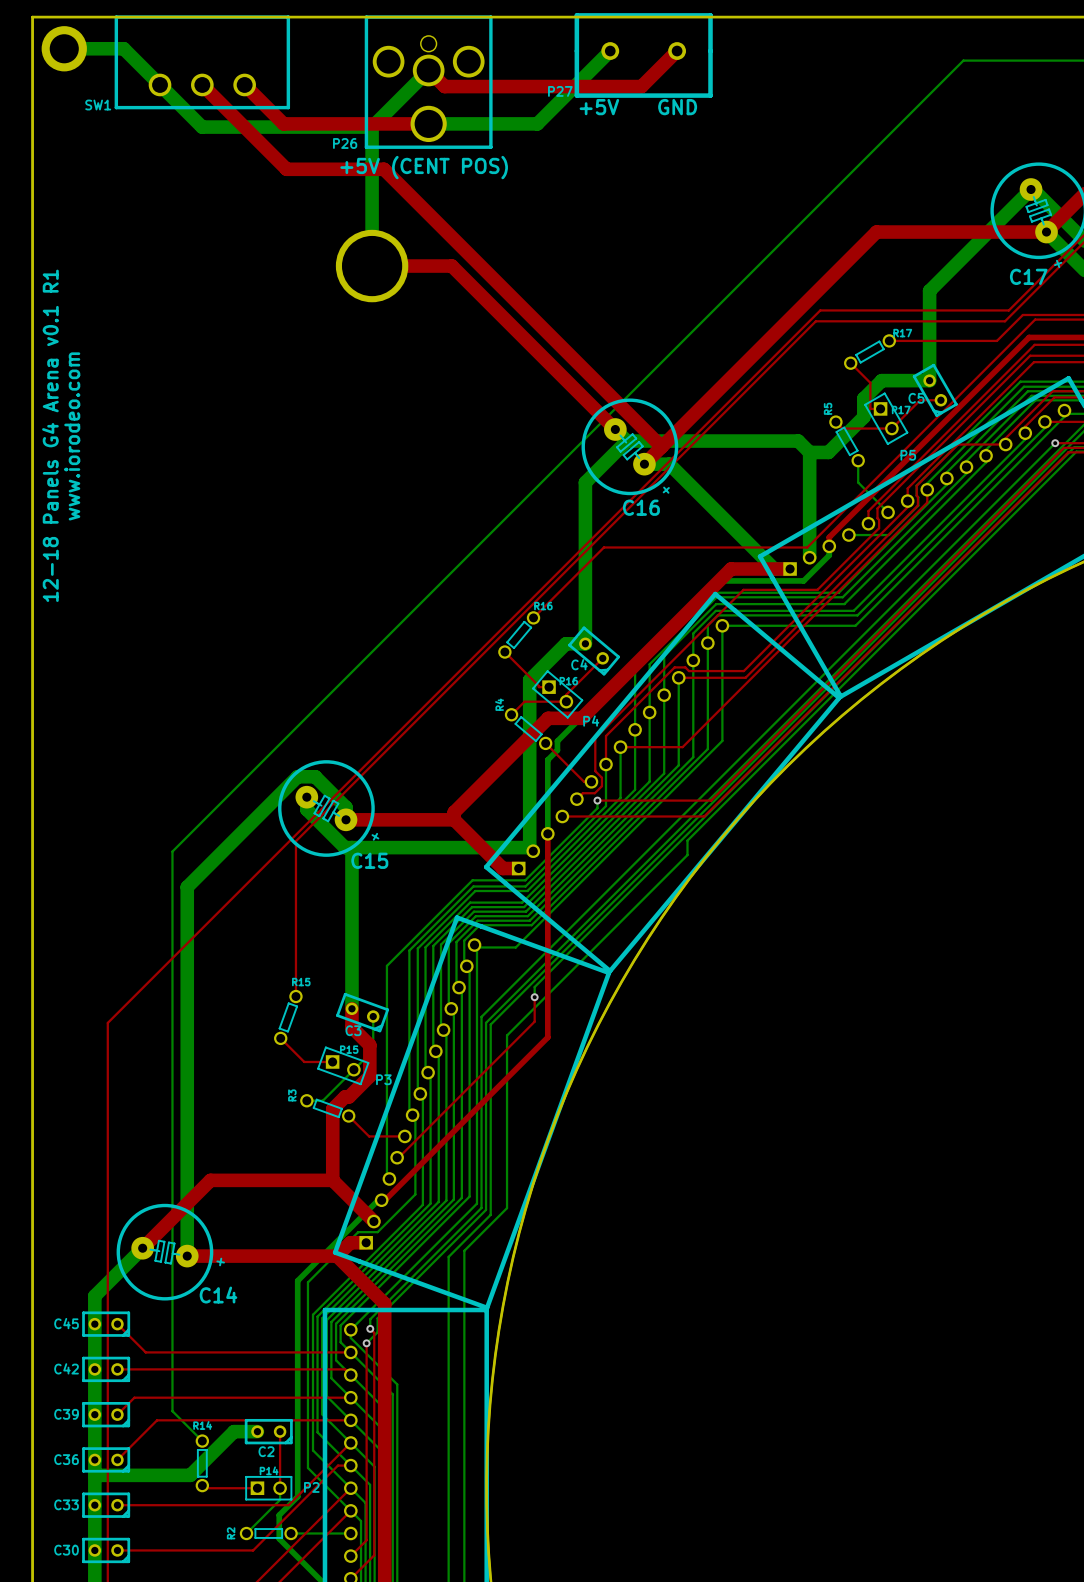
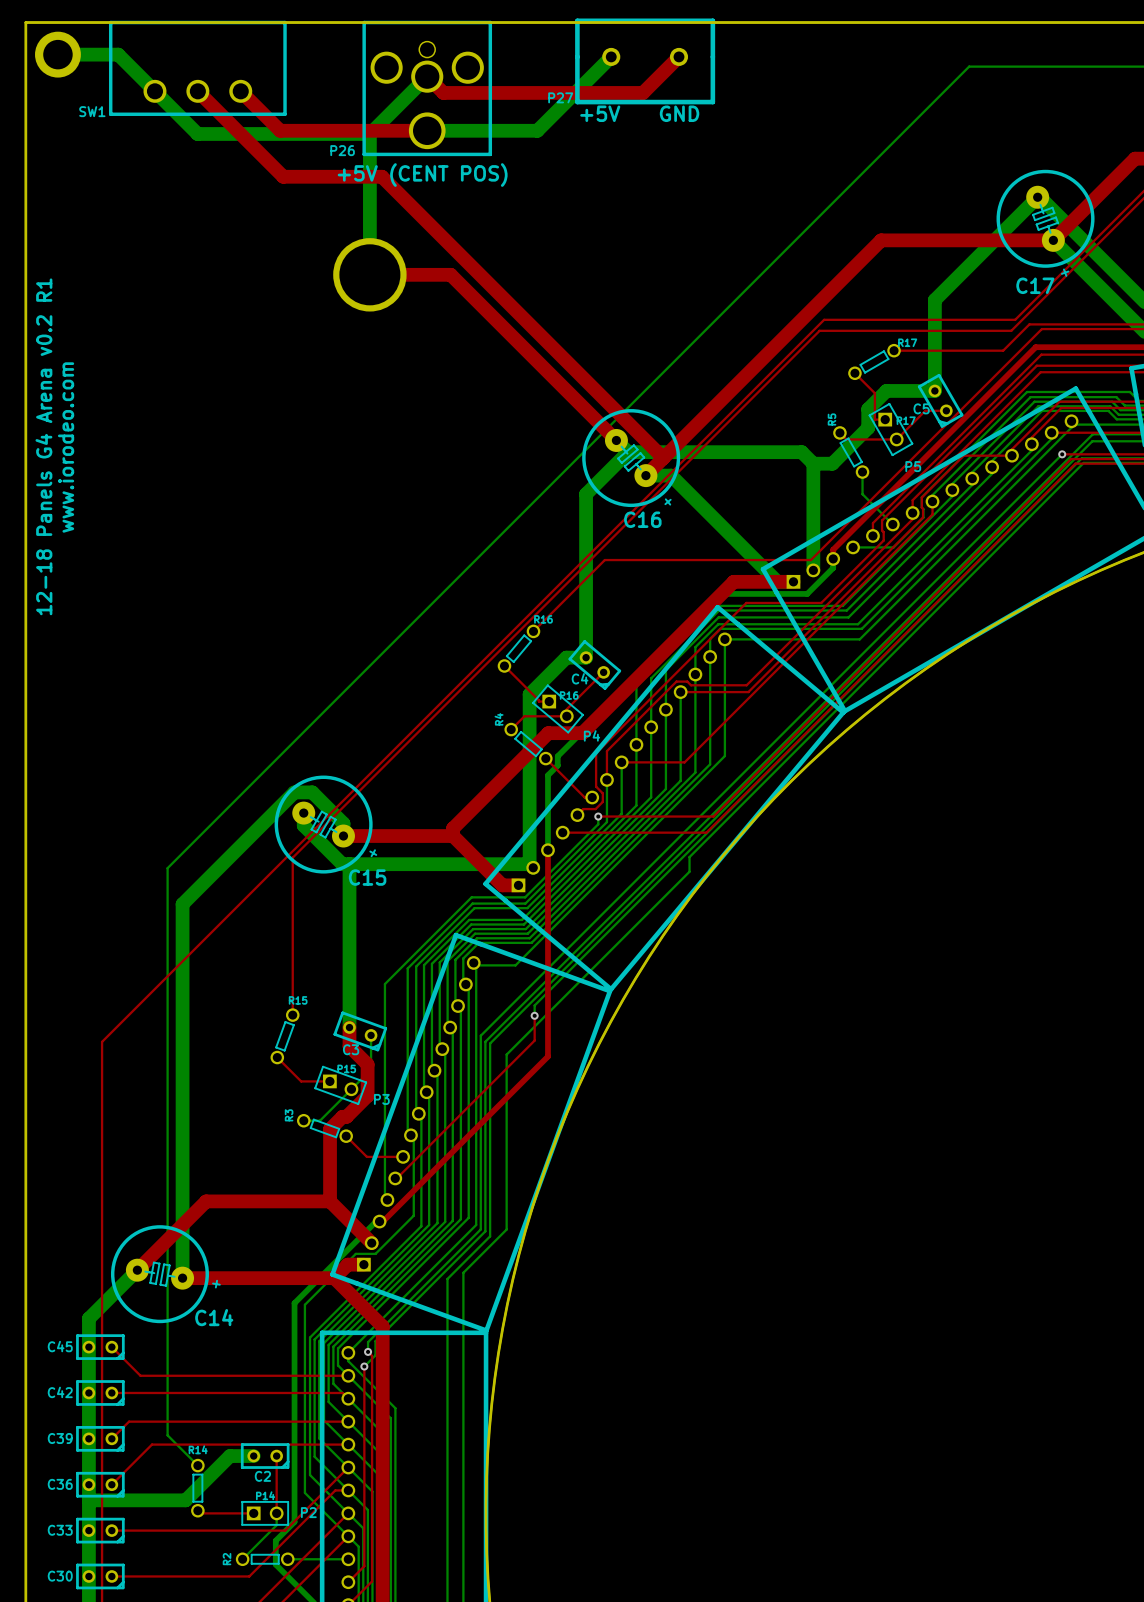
text: 12-18 Panels G4 Arena v0.1 R1 (50, 435) -> 12-18 Panels G4 Arena v0.2 R1 (43, 446)

